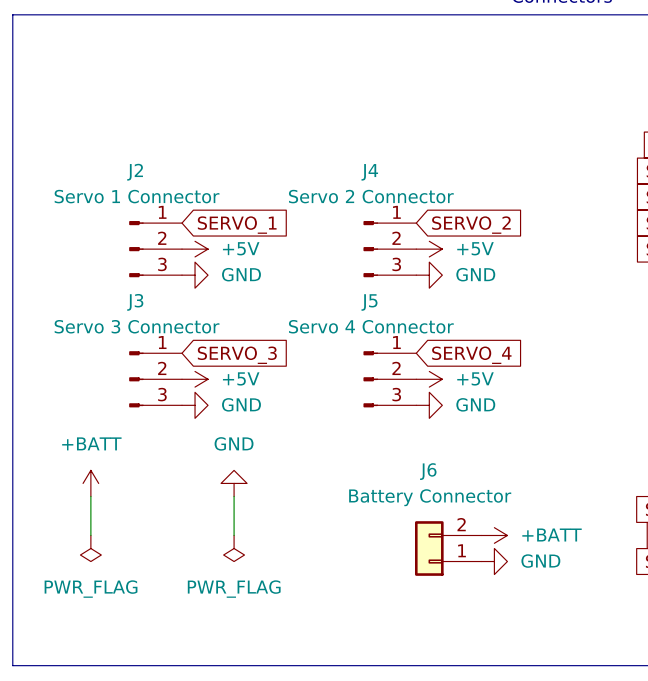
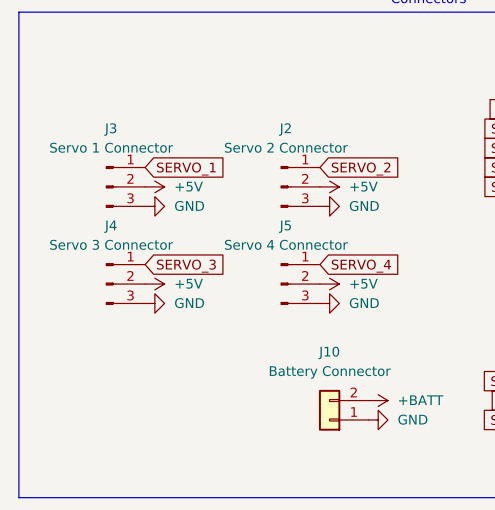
J2 name: J2 (135, 172) -> J3 (110, 129)
J4 name: J4 (369, 172) -> J2 (284, 129)
J3 name: J3 (135, 302) -> J4 (110, 226)
J6 name: J6 (428, 471) -> J10 (328, 352)
power symbol: +BATT (90, 483) -> none
power symbol: GND (234, 483) -> none
wire: (90, 496) (90, 535) -> none
wire: (234, 496) (234, 535) -> none
power symbol: PWR_FLAG (90, 548) -> none
power symbol: PWR_FLAG (234, 548) -> none

